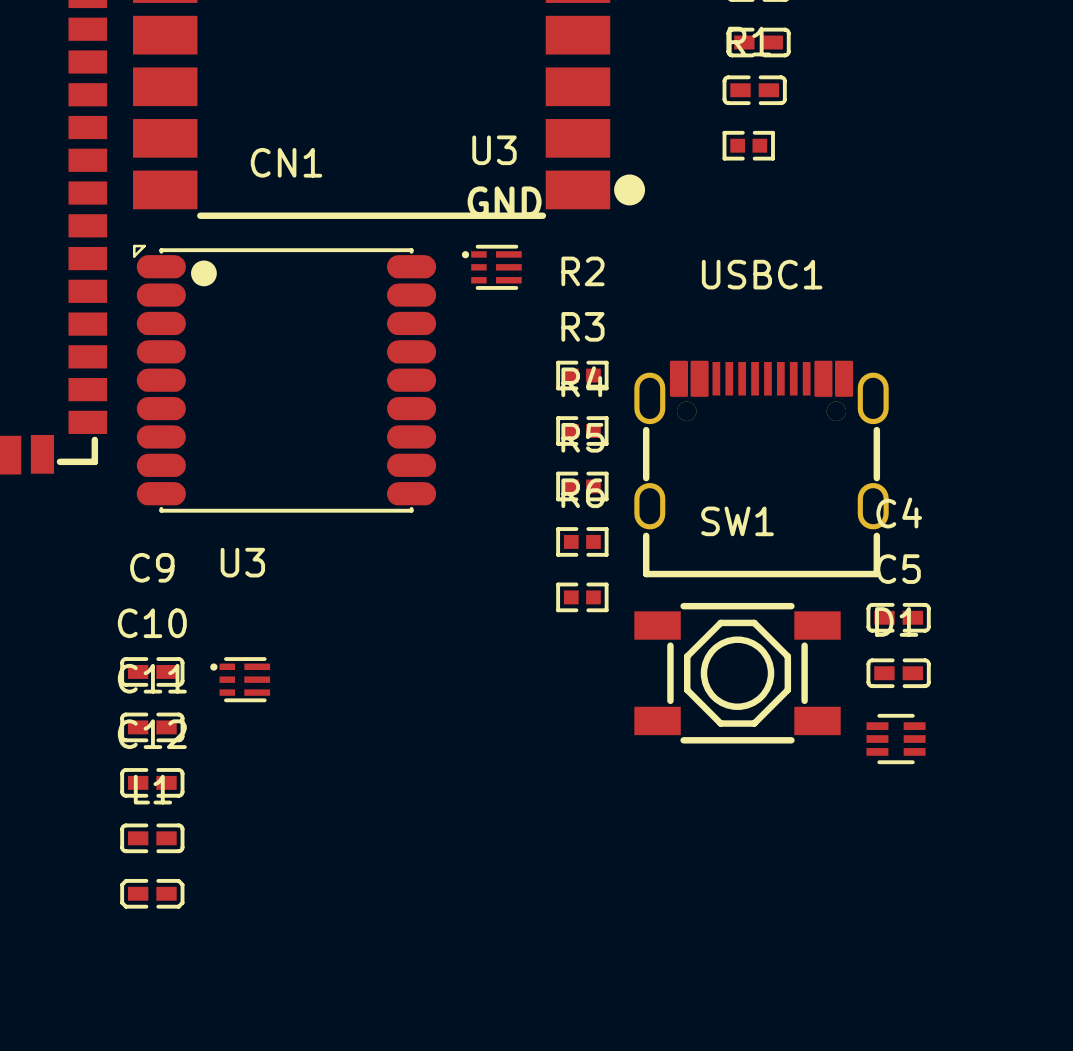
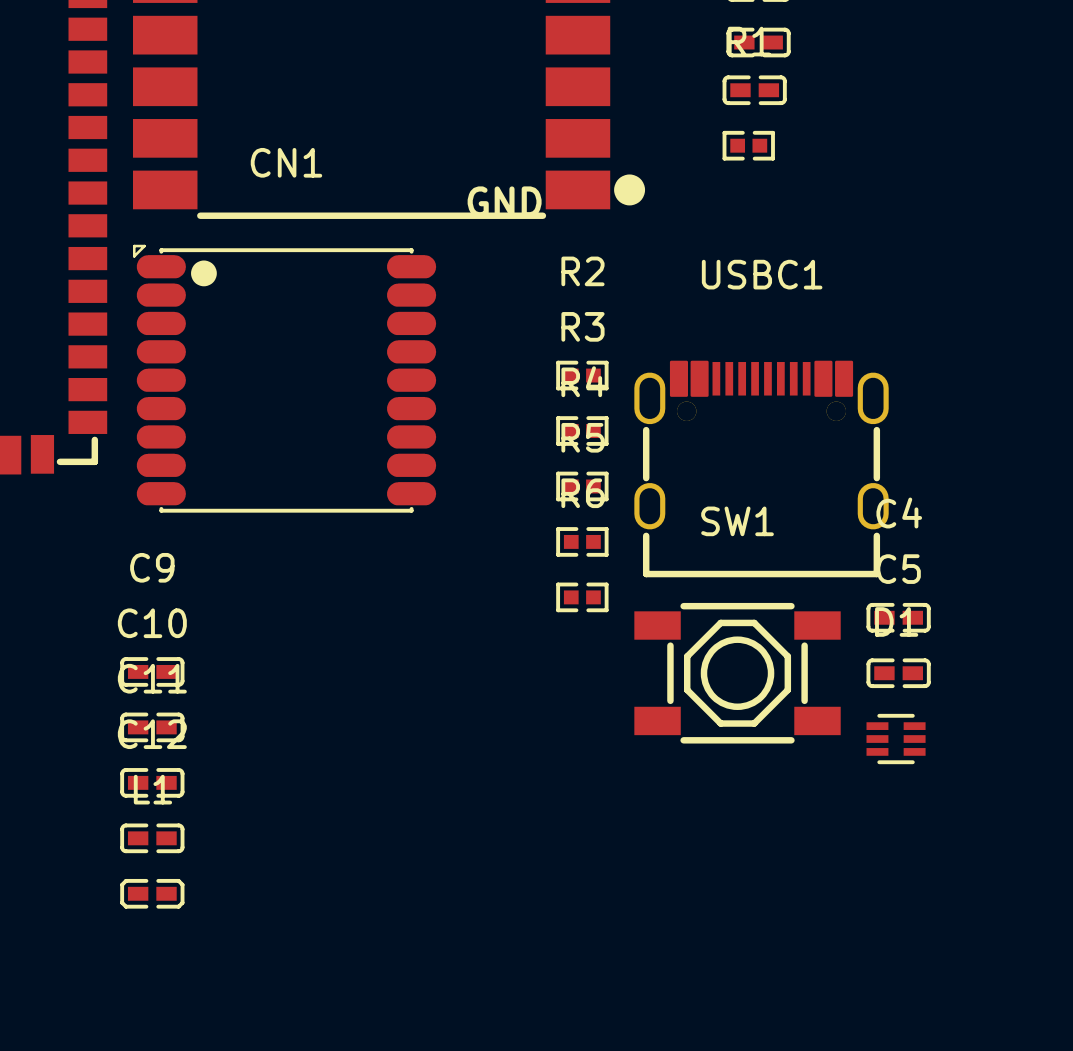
U3: (491, 267) -> none
U3: (240, 679) -> none

